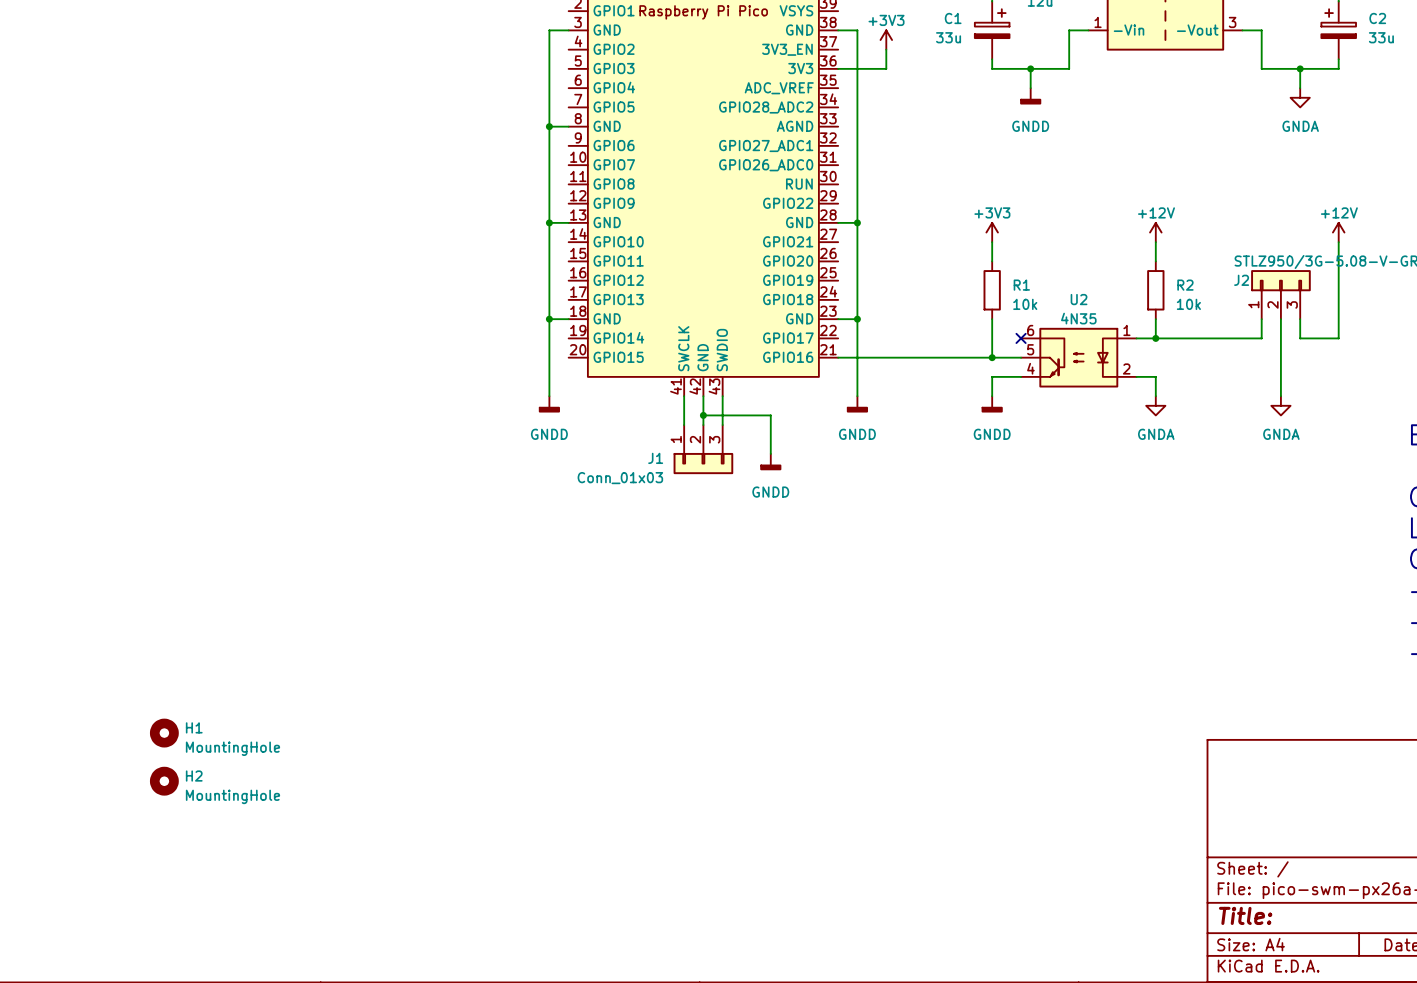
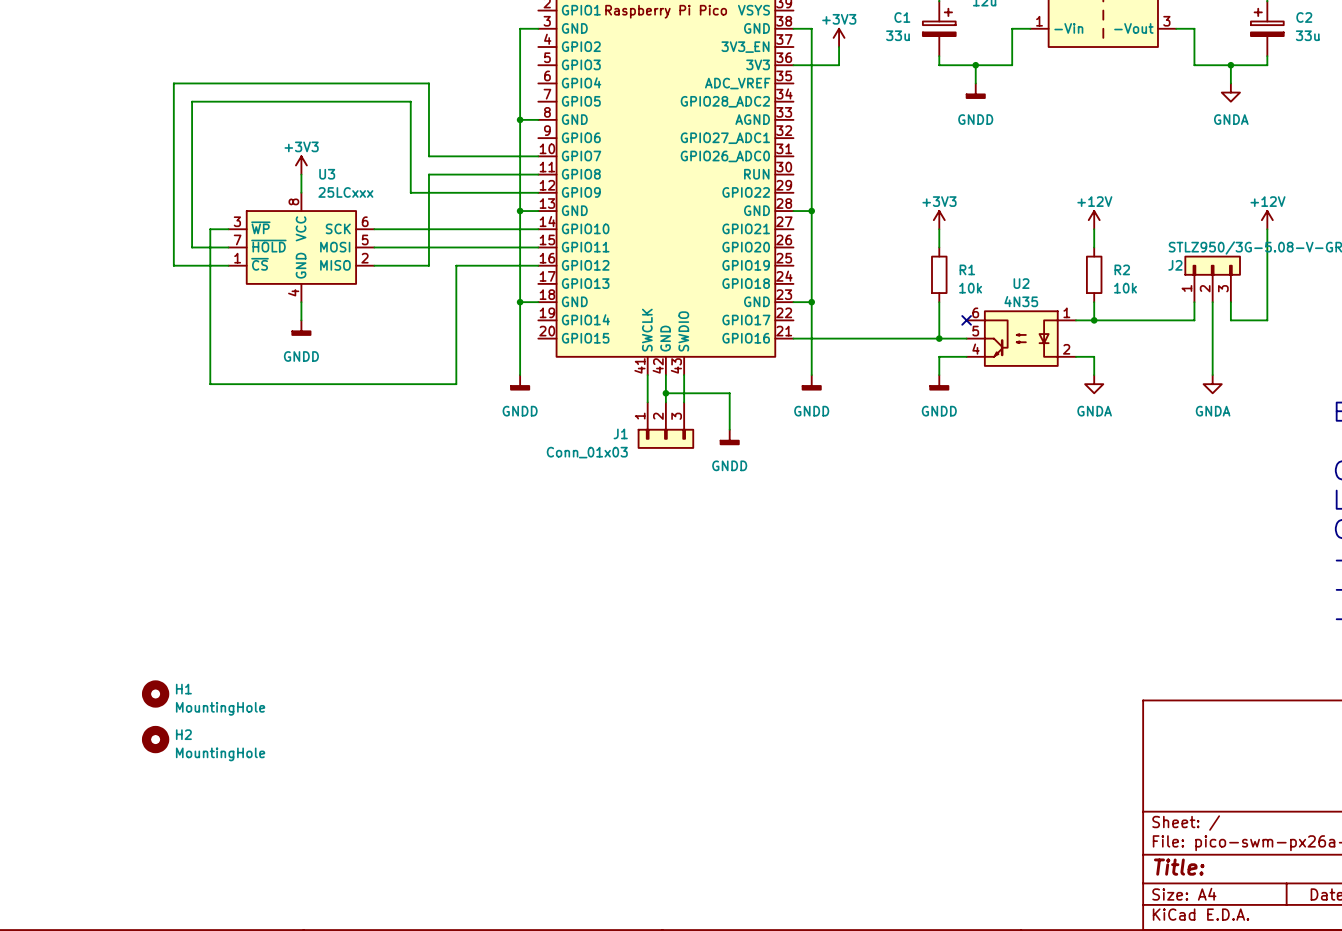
wire: none -> (538, 156) (428, 156) (428, 83) (173, 83) (173, 265) (228, 265)
power symbol: none -> +3V3 (301, 165)
wire: none -> (301, 174) (301, 192)
wire: none -> (538, 174) (428, 174) (428, 265) (374, 265)
wire: none -> (538, 192) (410, 192) (410, 101) (192, 101) (192, 247) (228, 247)
wire: none -> (228, 229) (210, 229) (210, 384) (456, 384) (456, 265) (538, 265)
wire: none -> (374, 229) (538, 229)
U3: none -> 25LCxxx (301, 247)
wire: none -> (374, 247) (538, 247)
wire: none -> (301, 302) (301, 320)
power symbol: none -> GNDD (301, 328)

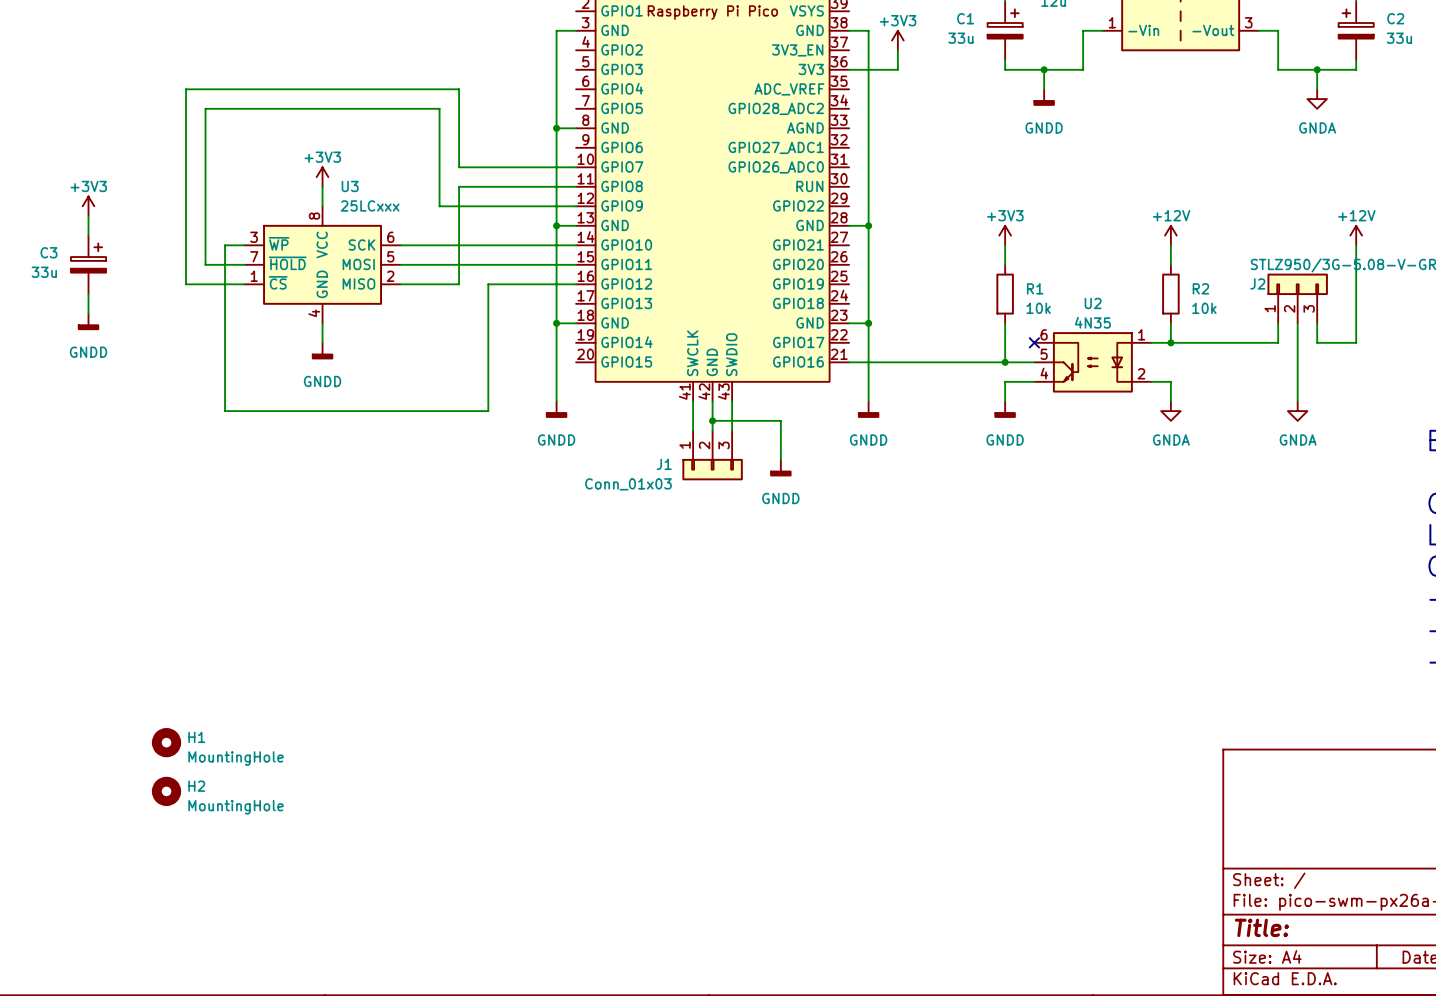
power symbol: none -> +3V3 (88, 206)
wire: none -> (88, 216) (88, 235)
C3: none -> 33u (88, 264)
wire: none -> (88, 294) (88, 313)
power symbol: none -> GNDD (88, 321)

